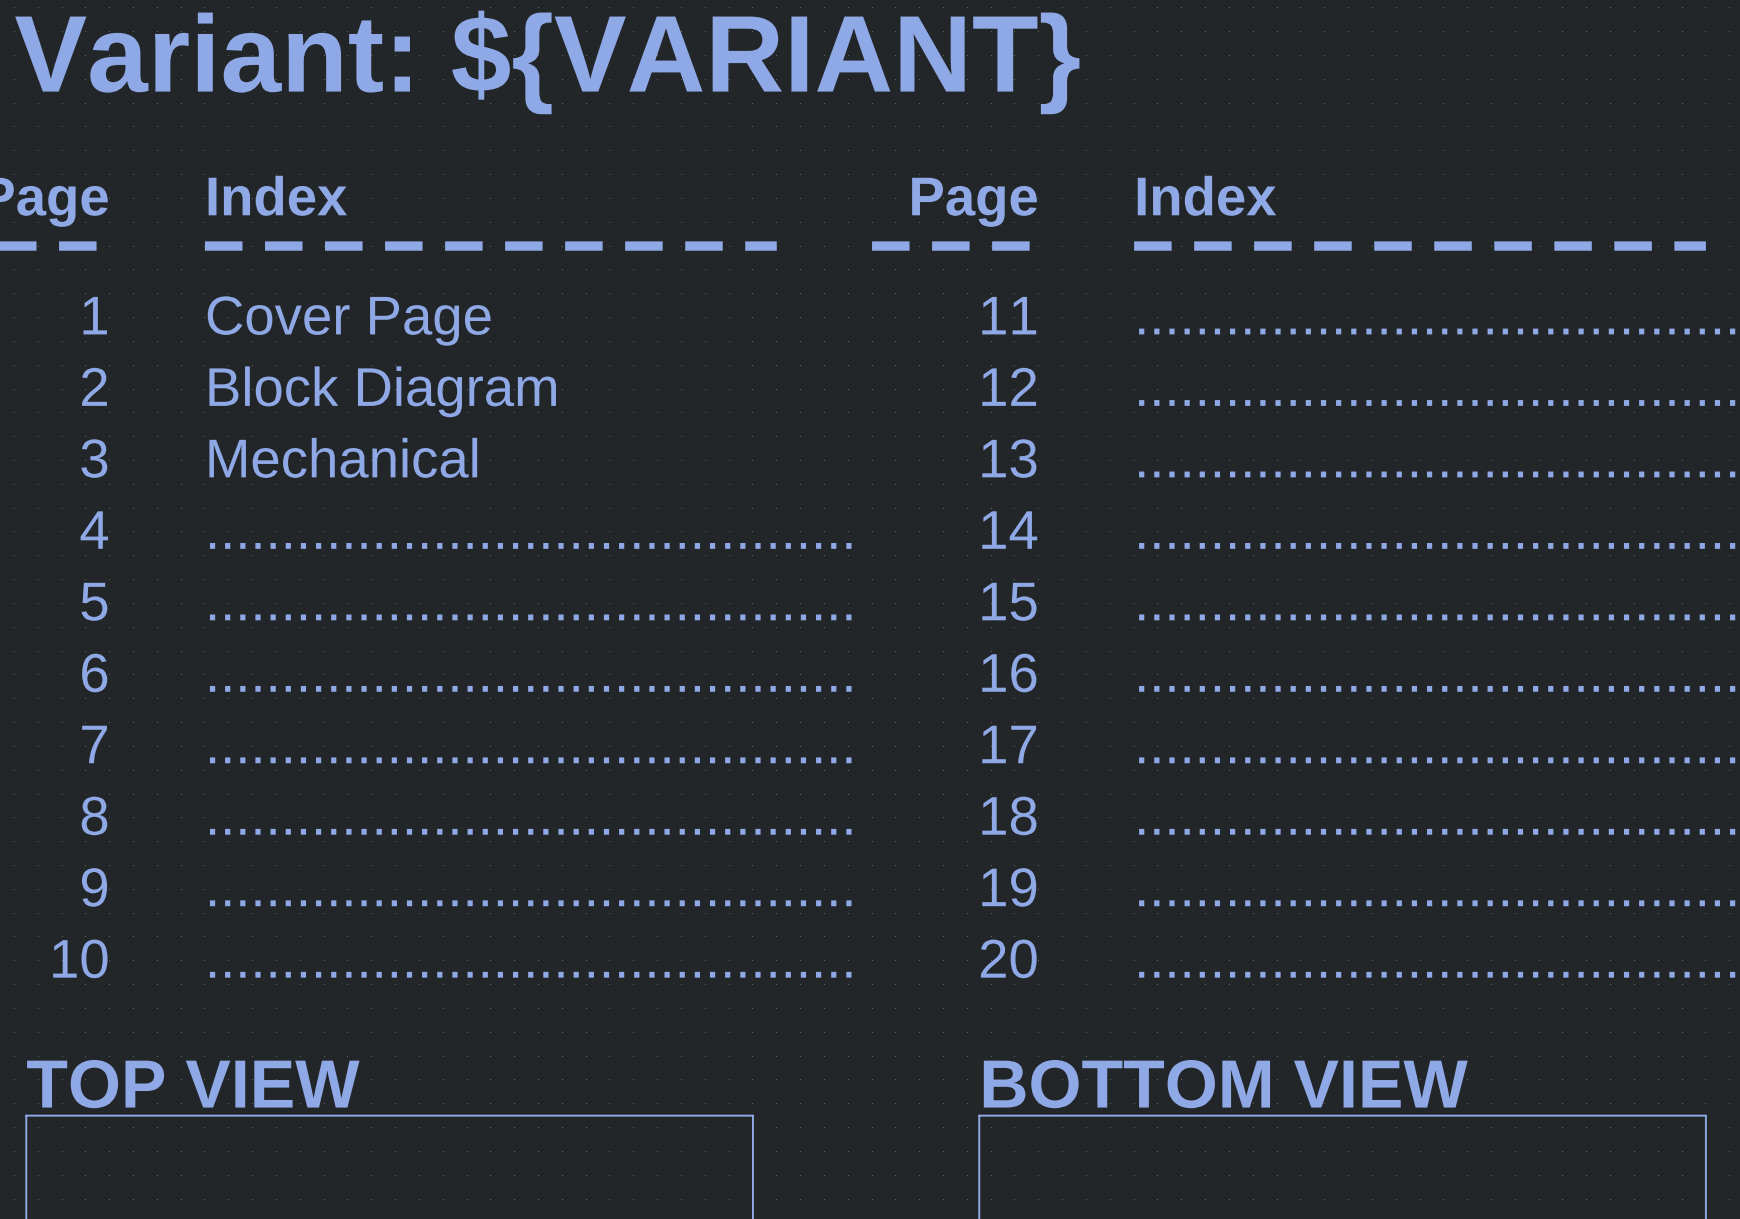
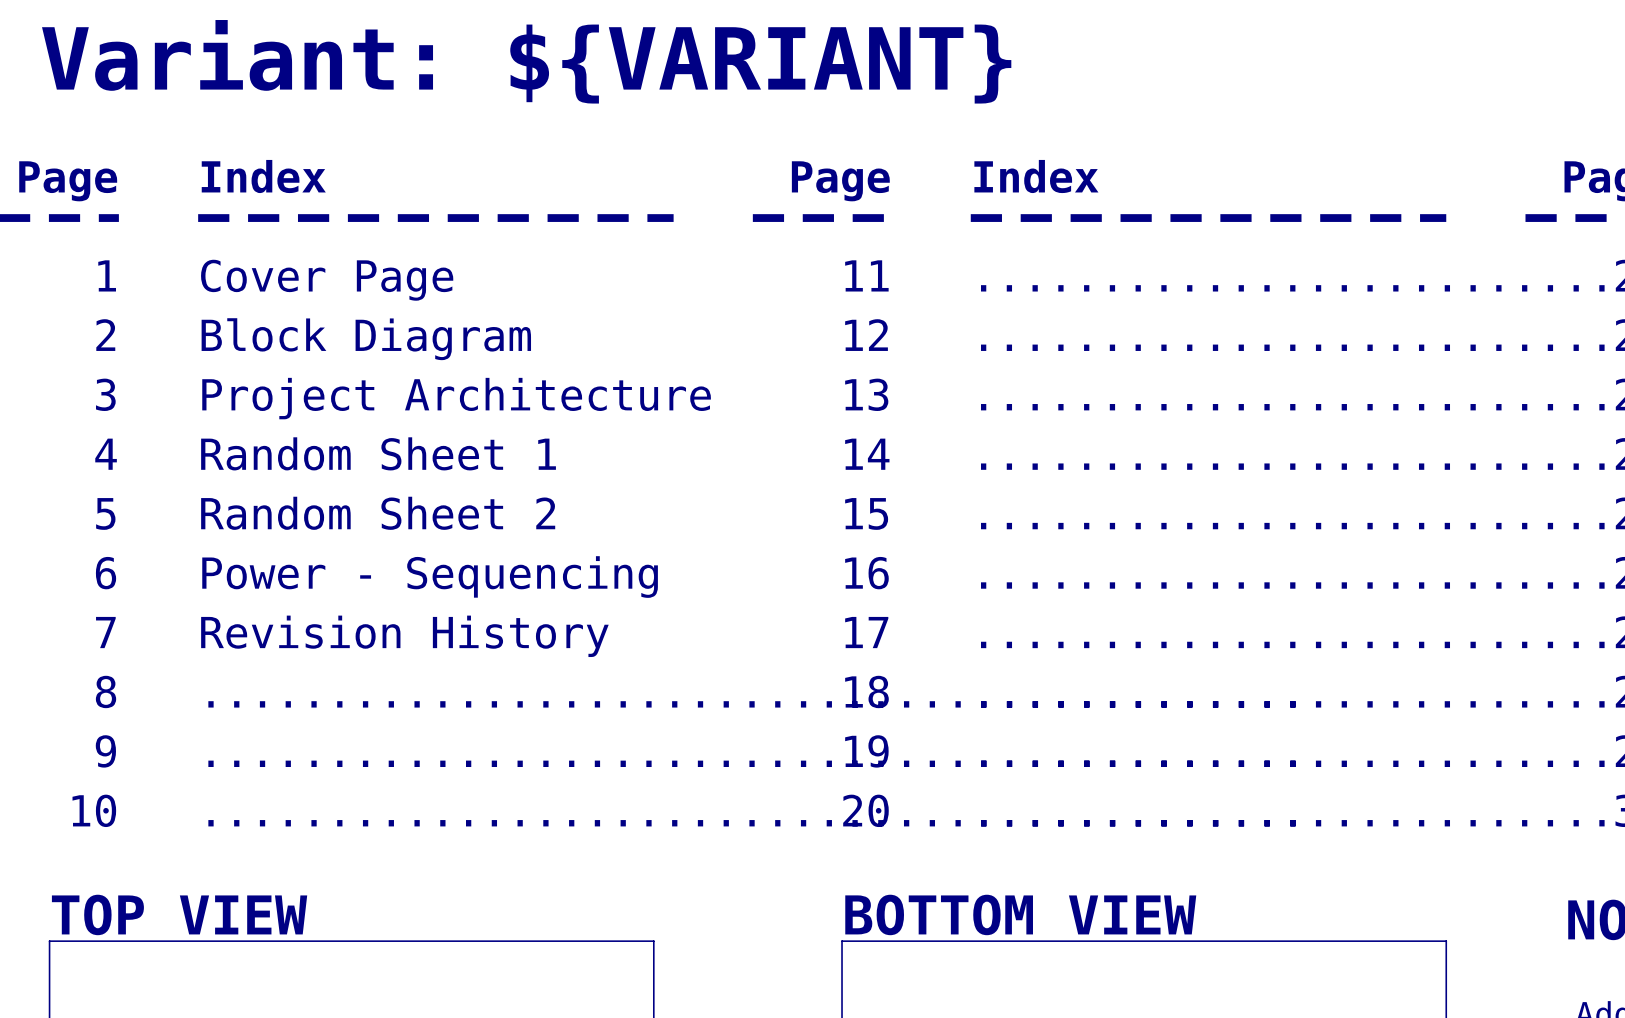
text: Mechanical (343, 457) -> Project Architecture (456, 398)
text: ........................................... (530, 545) -> Random Sheet 1 (378, 453)
text: ........................................... (530, 617) -> Random Sheet 2 (378, 513)
text: ........................................... (530, 688) -> Power - Sequencing (430, 577)
text: ........................................... (530, 760) -> Revision History (404, 636)

